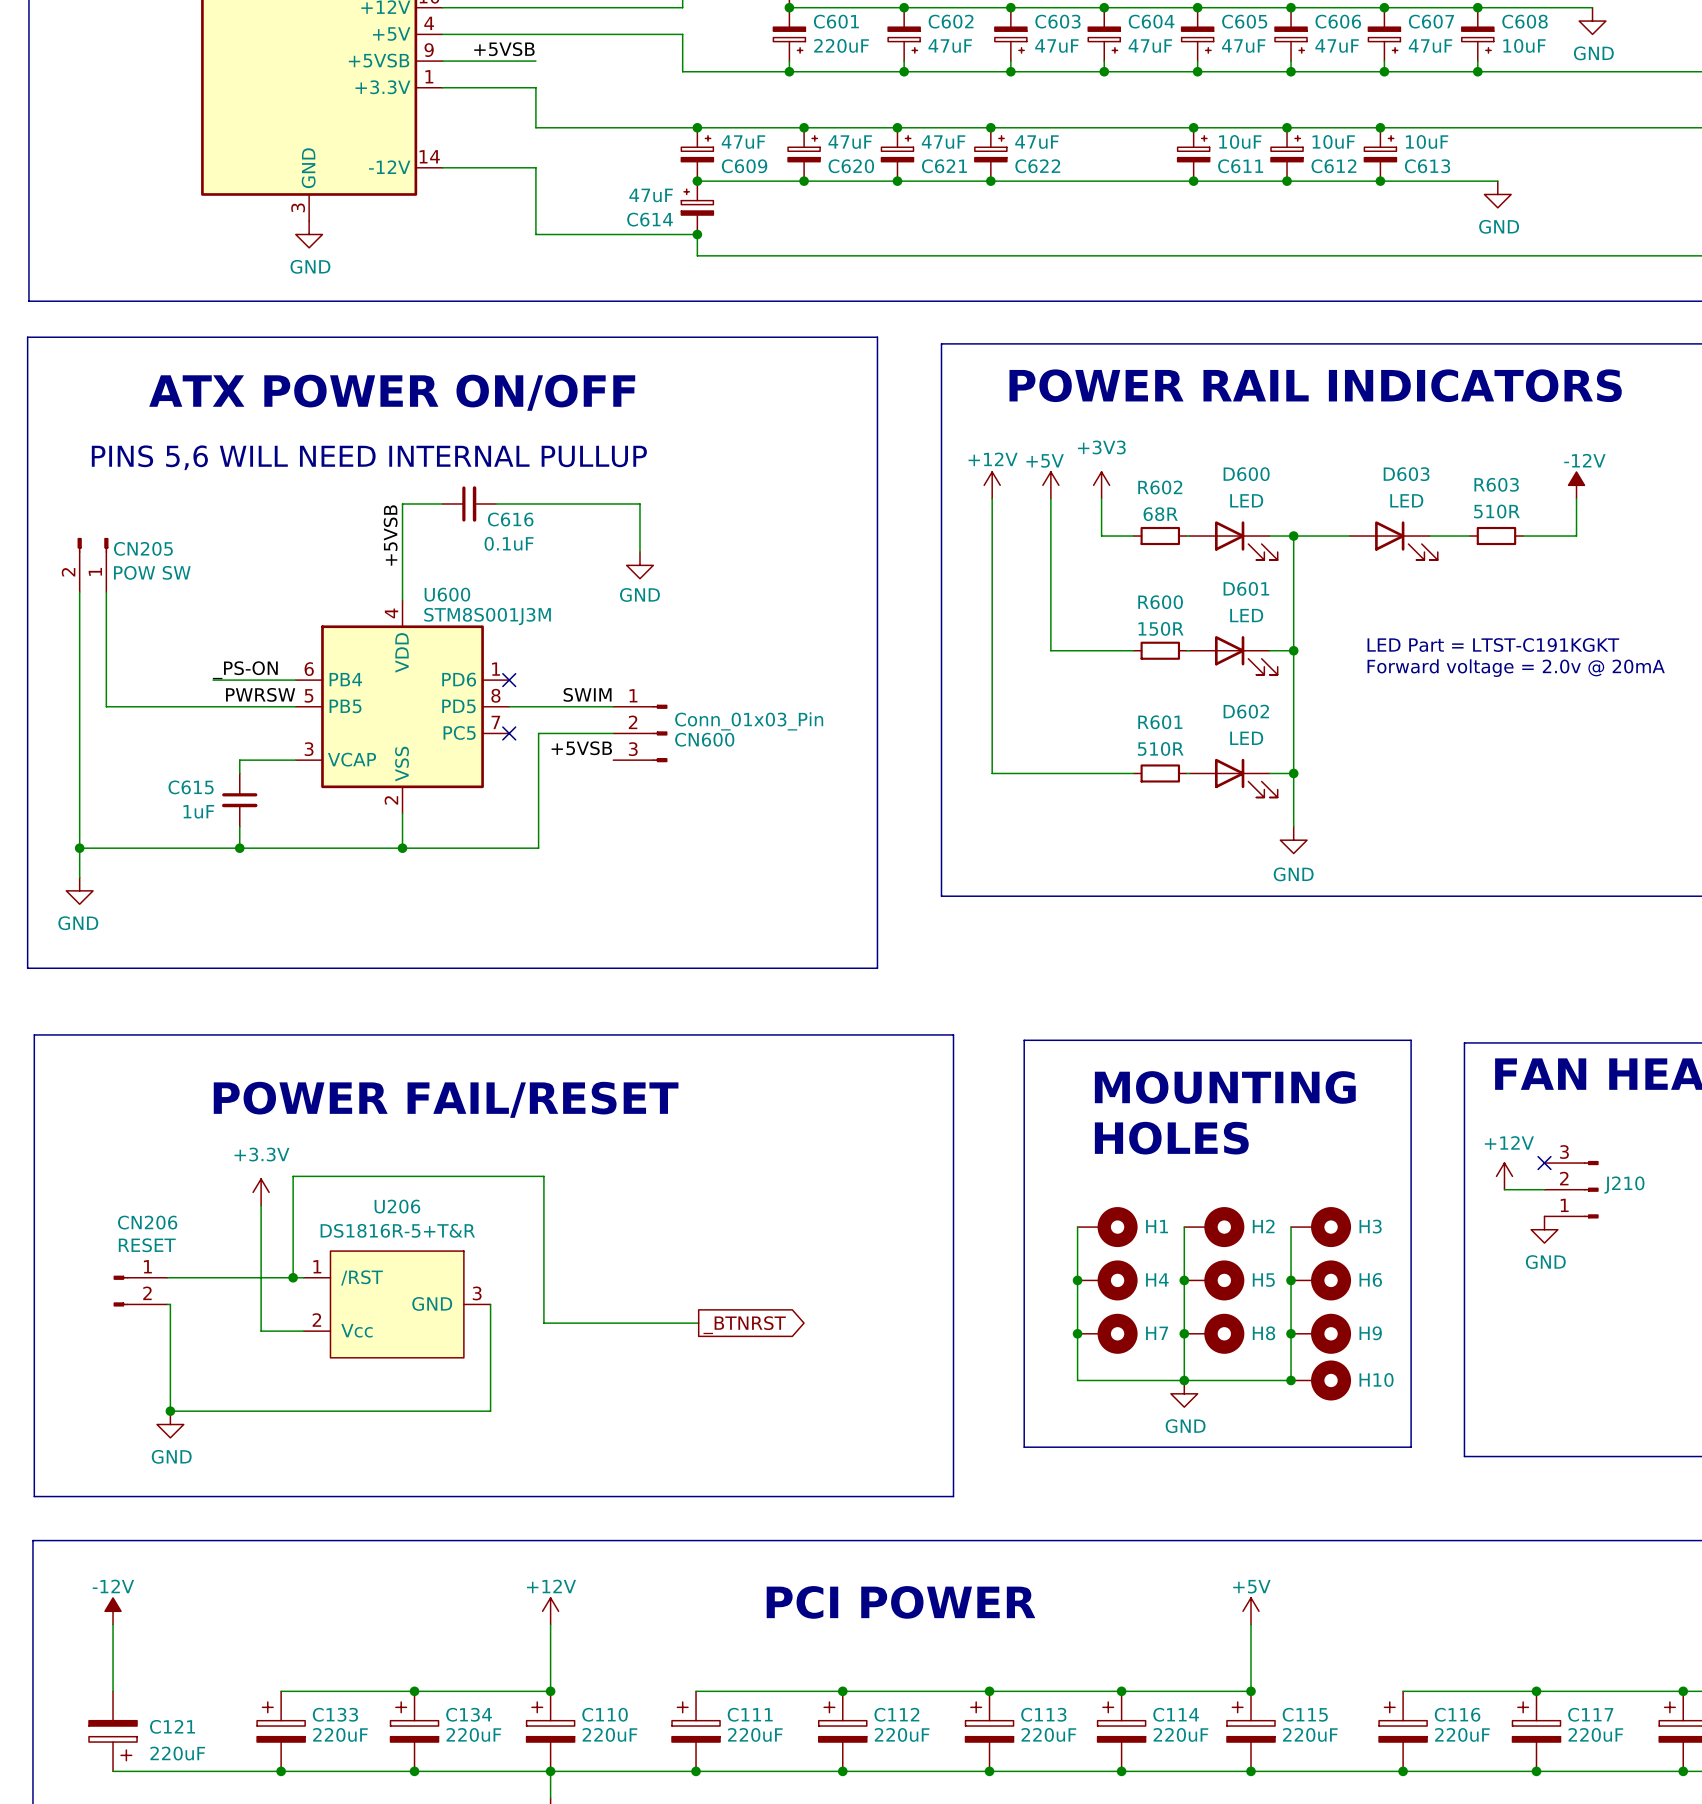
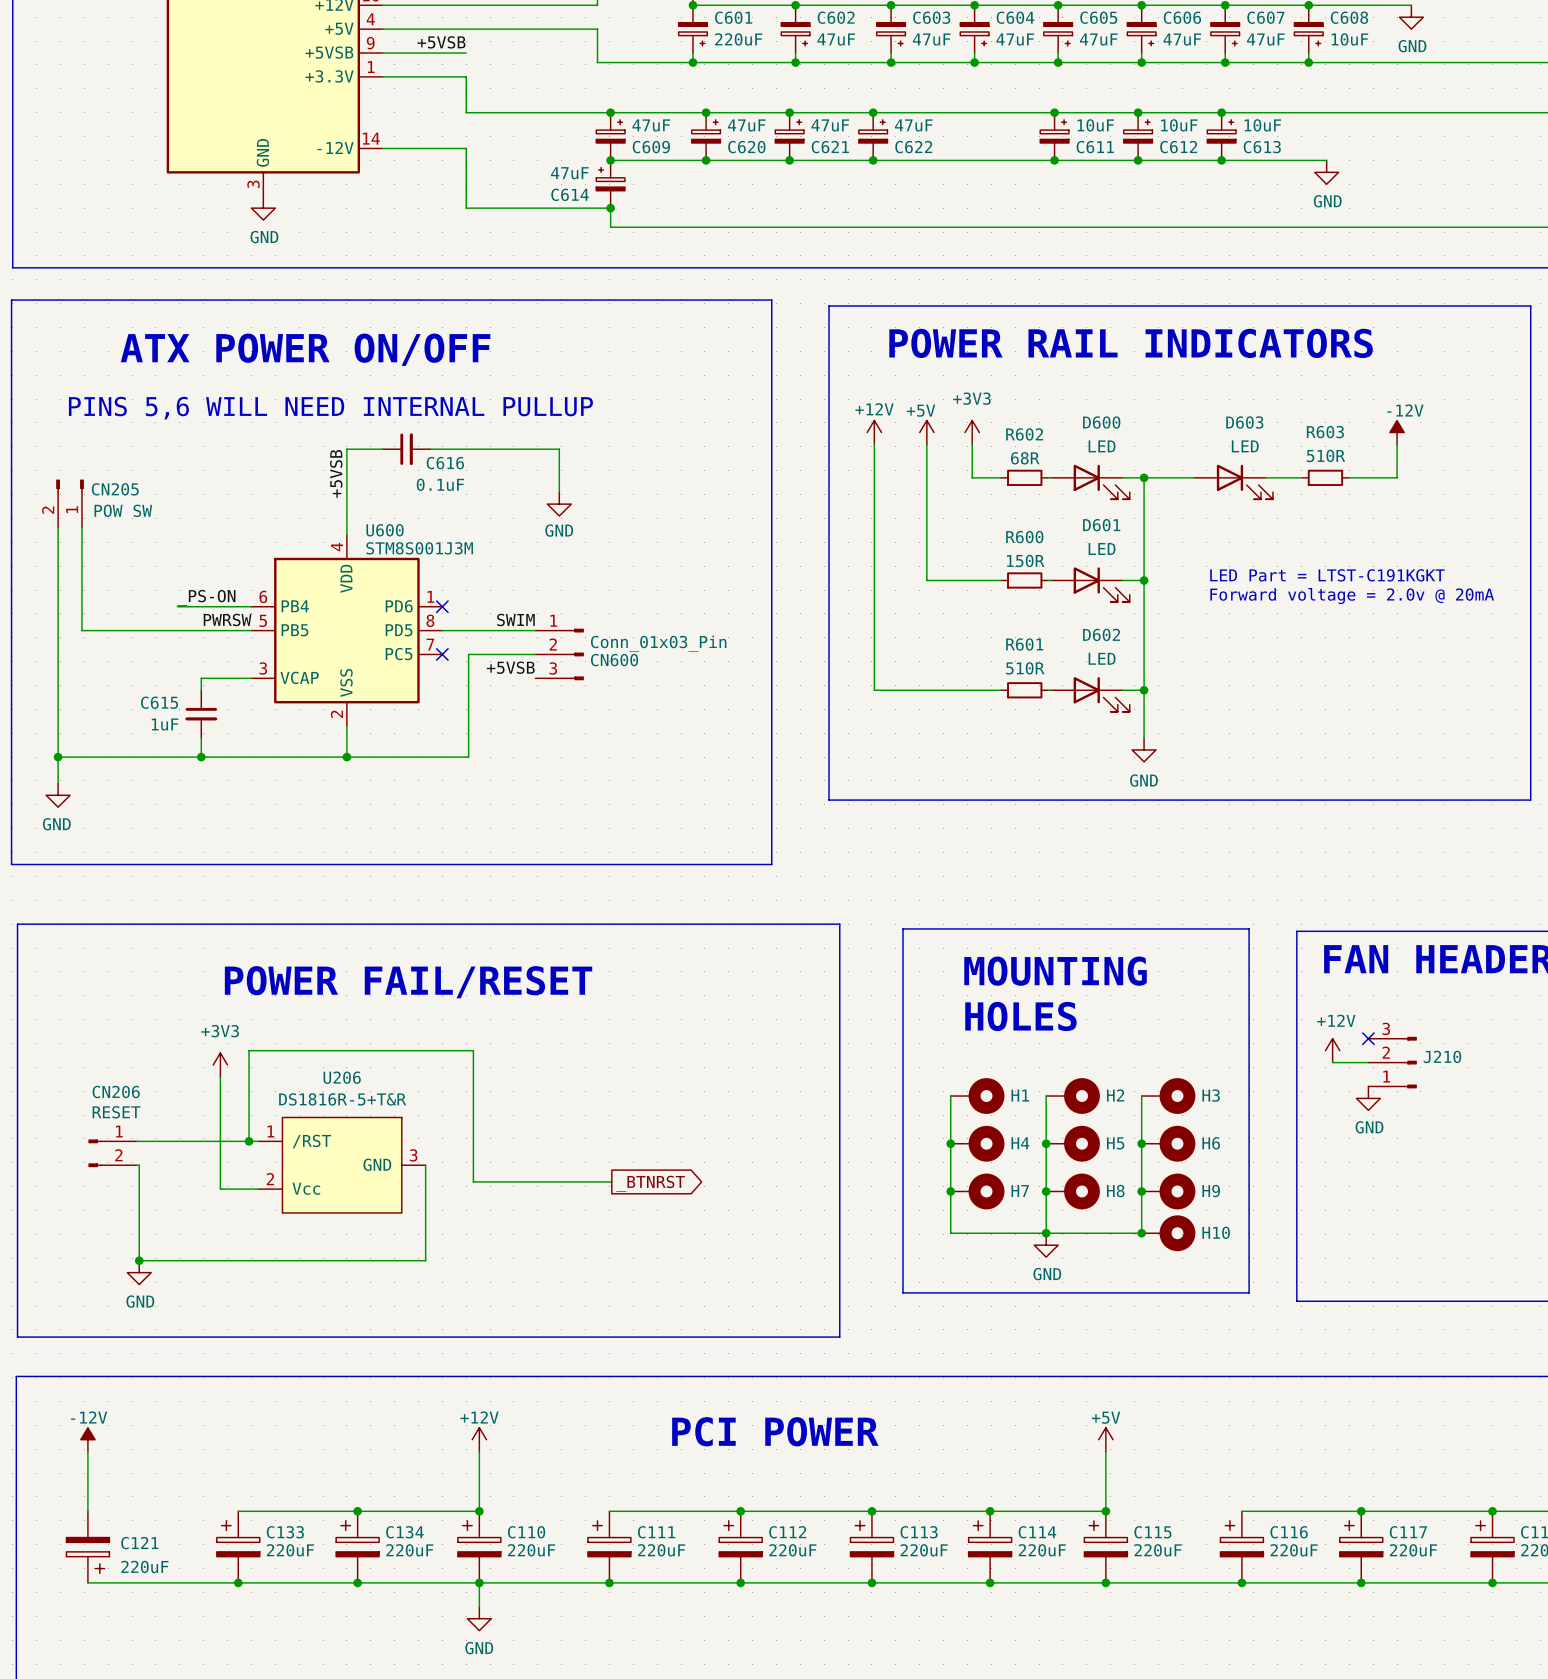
power symbol: +3.3V (261, 1192) -> +3V3 (220, 1064)

